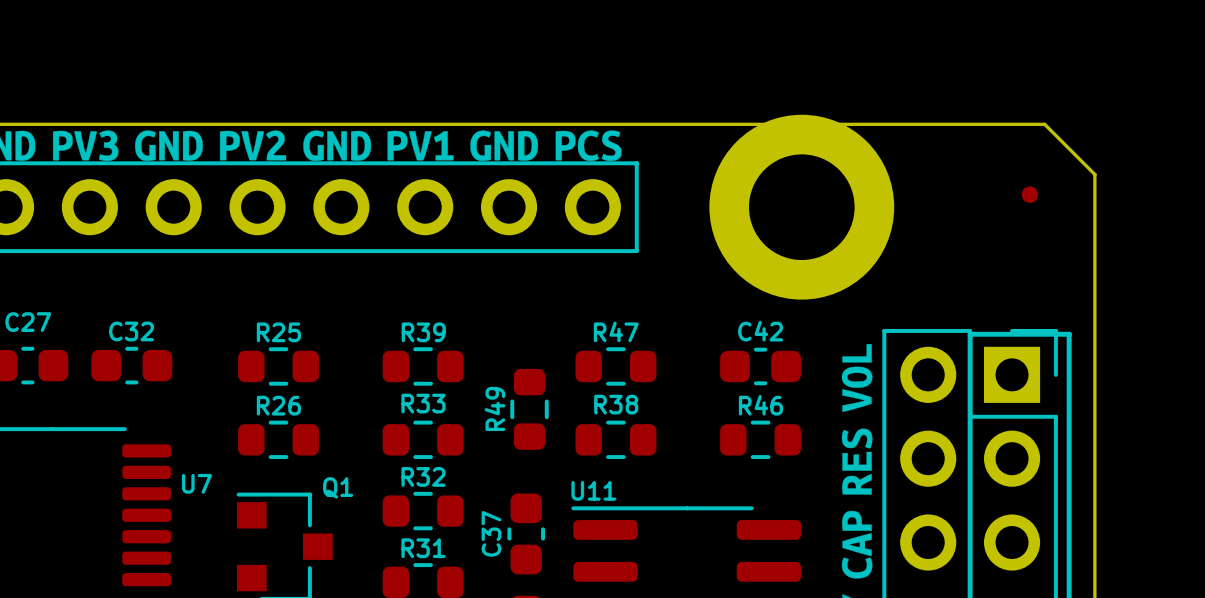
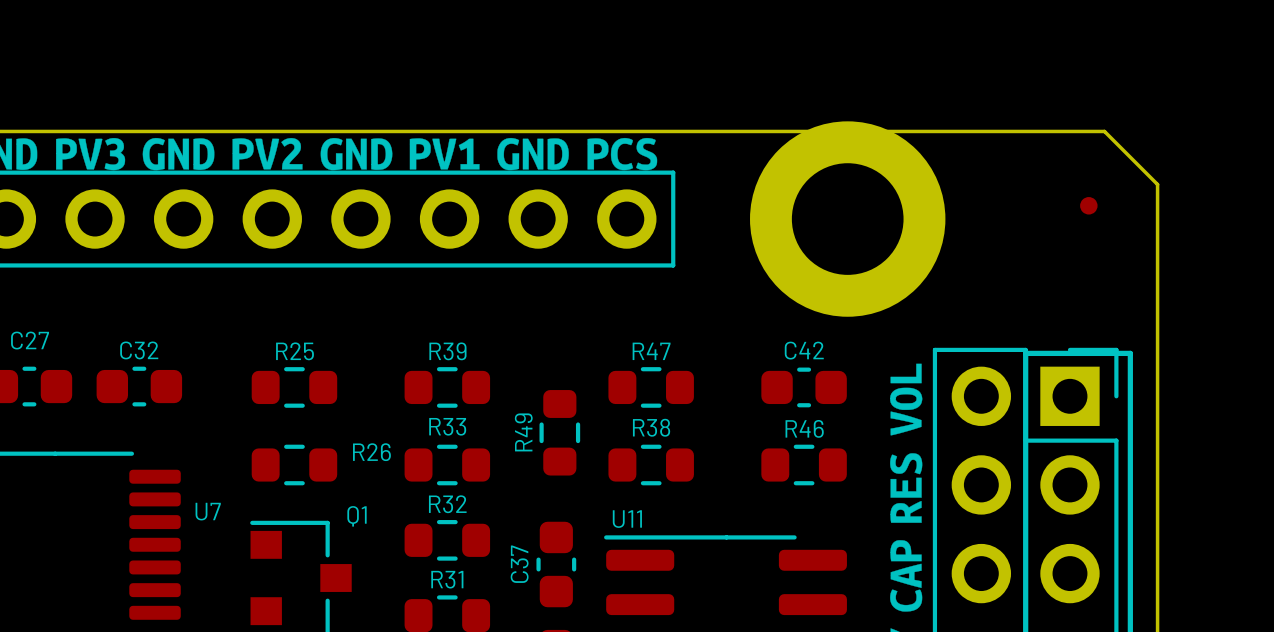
R26 name position: R26 (278, 405) -> R26 (371, 452)

